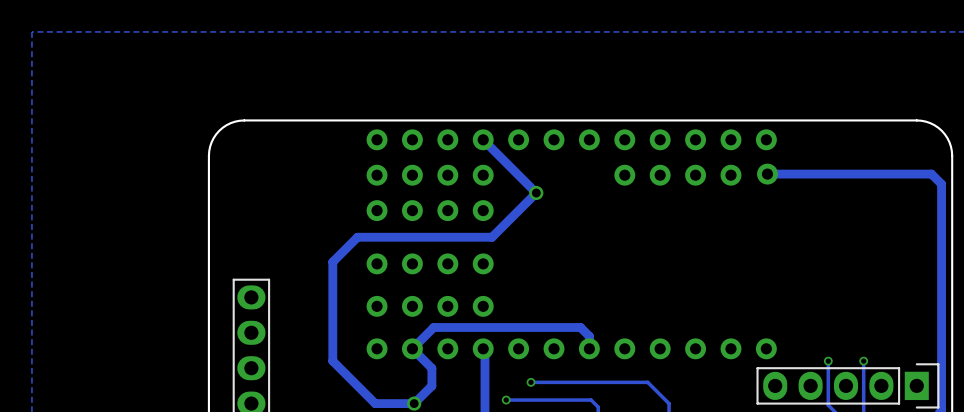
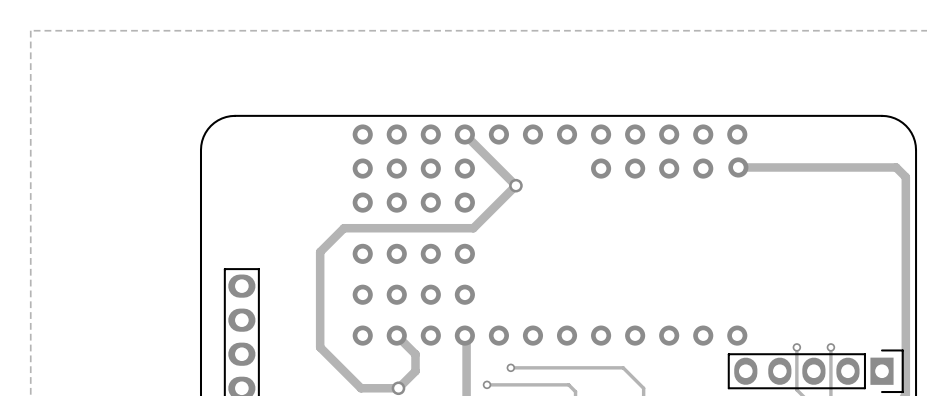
track: (589, 348) (589, 336) (580, 327) (433, 327) (412, 348) -> none

